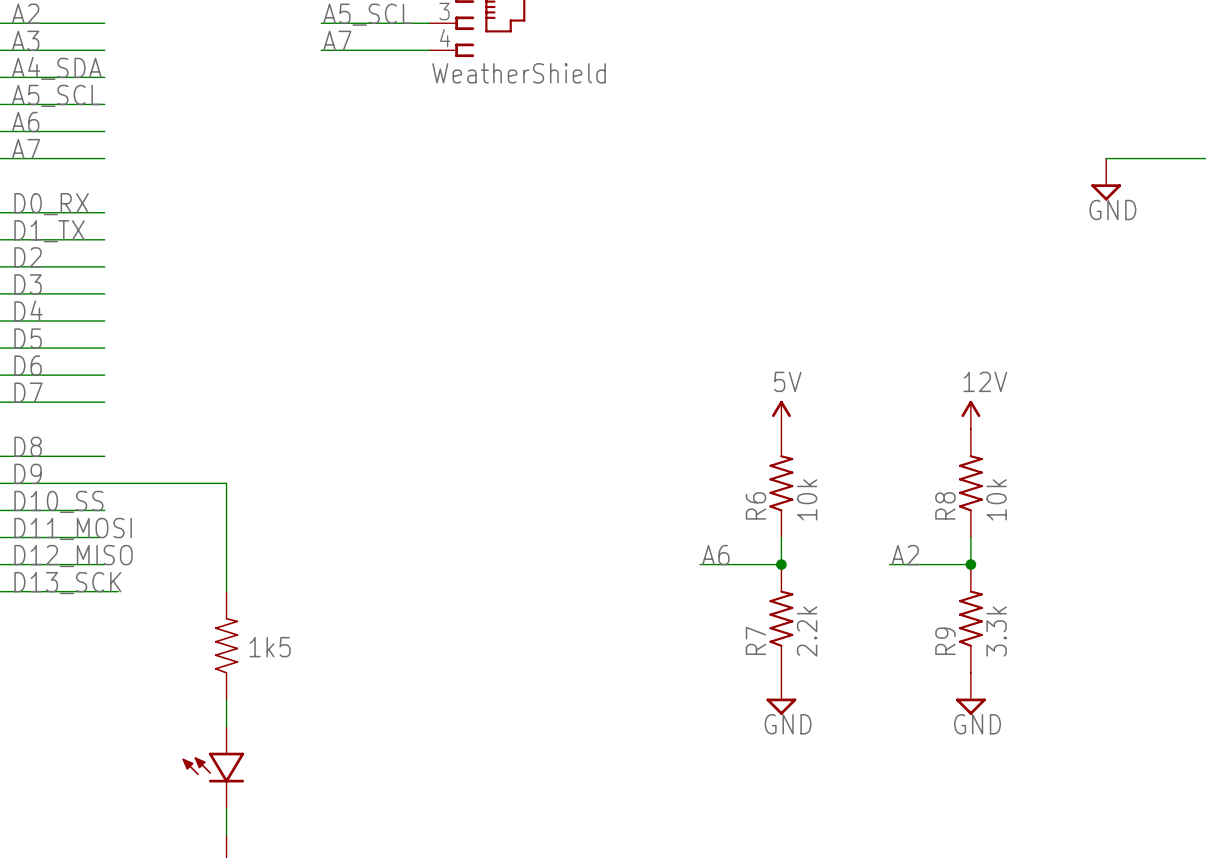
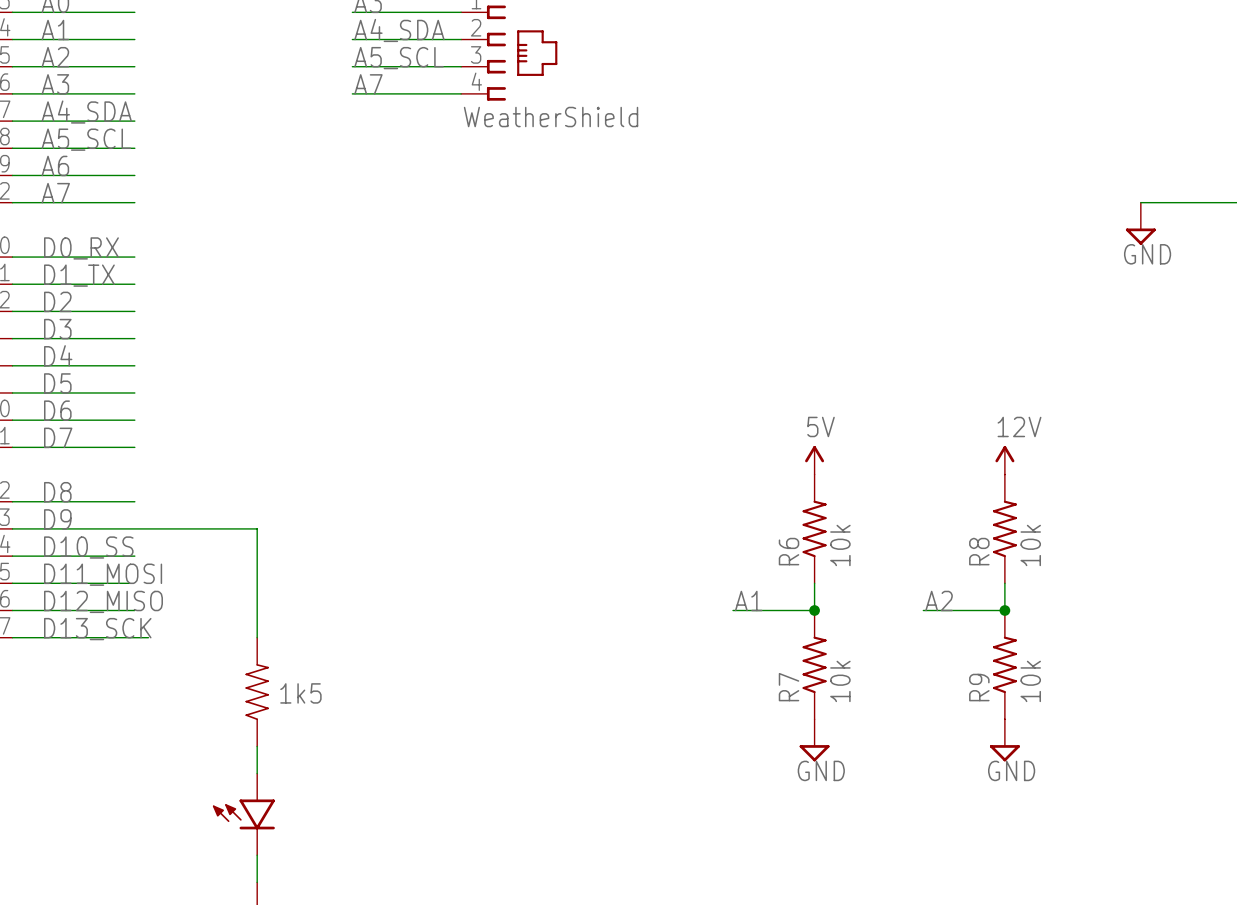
label: A6 (715, 555) -> A1 (748, 600)
R7 value: 2.2k (807, 631) -> 10k (840, 681)
R9 value: 3.3k (996, 631) -> 10k (1030, 681)

